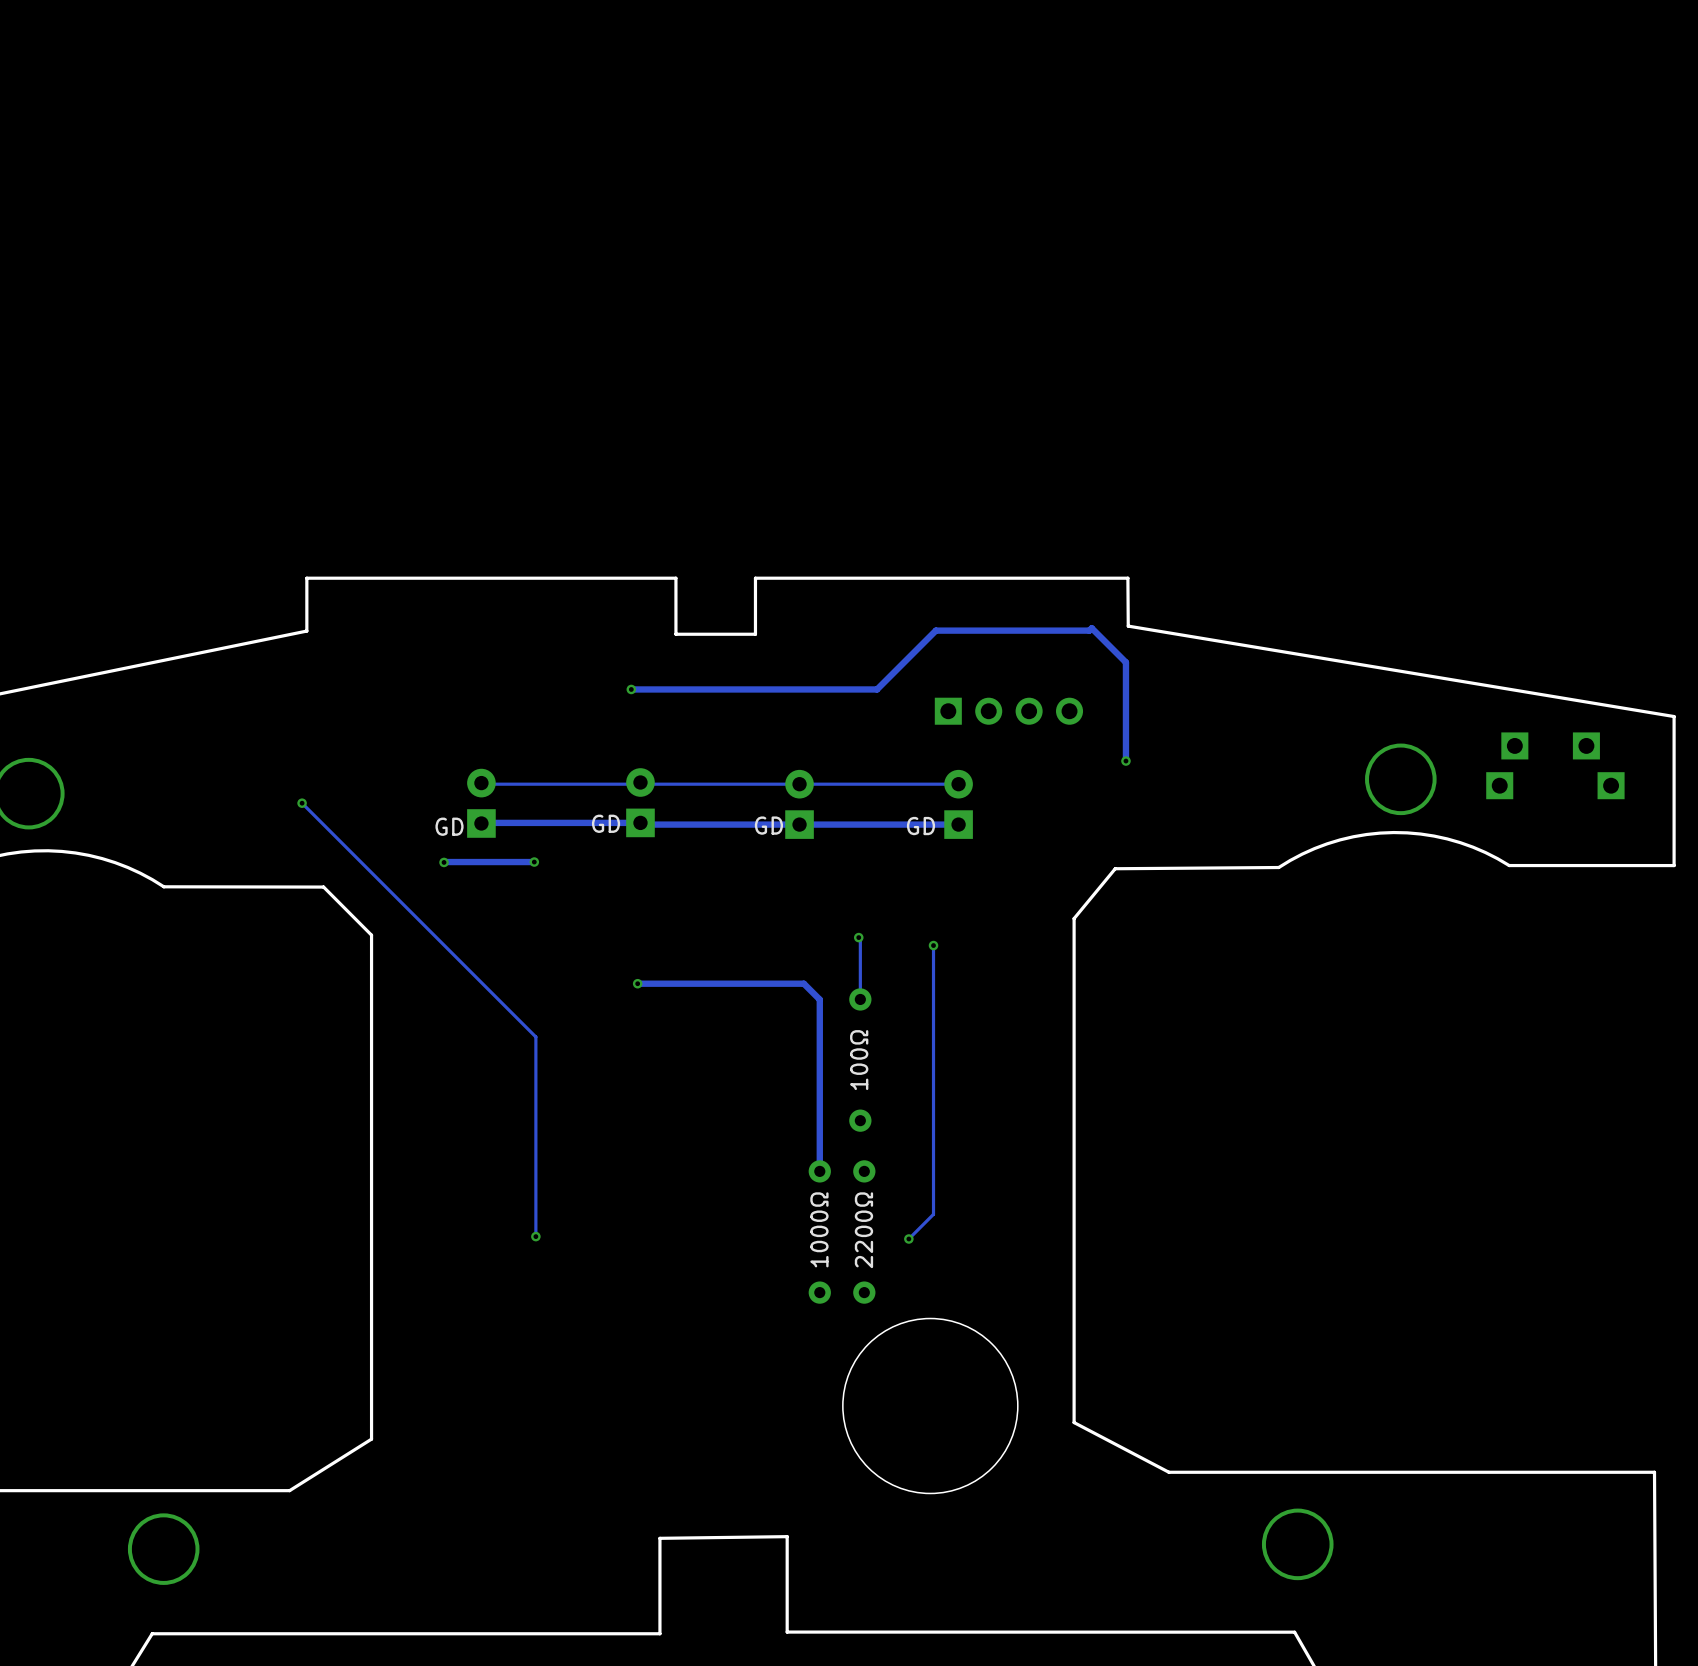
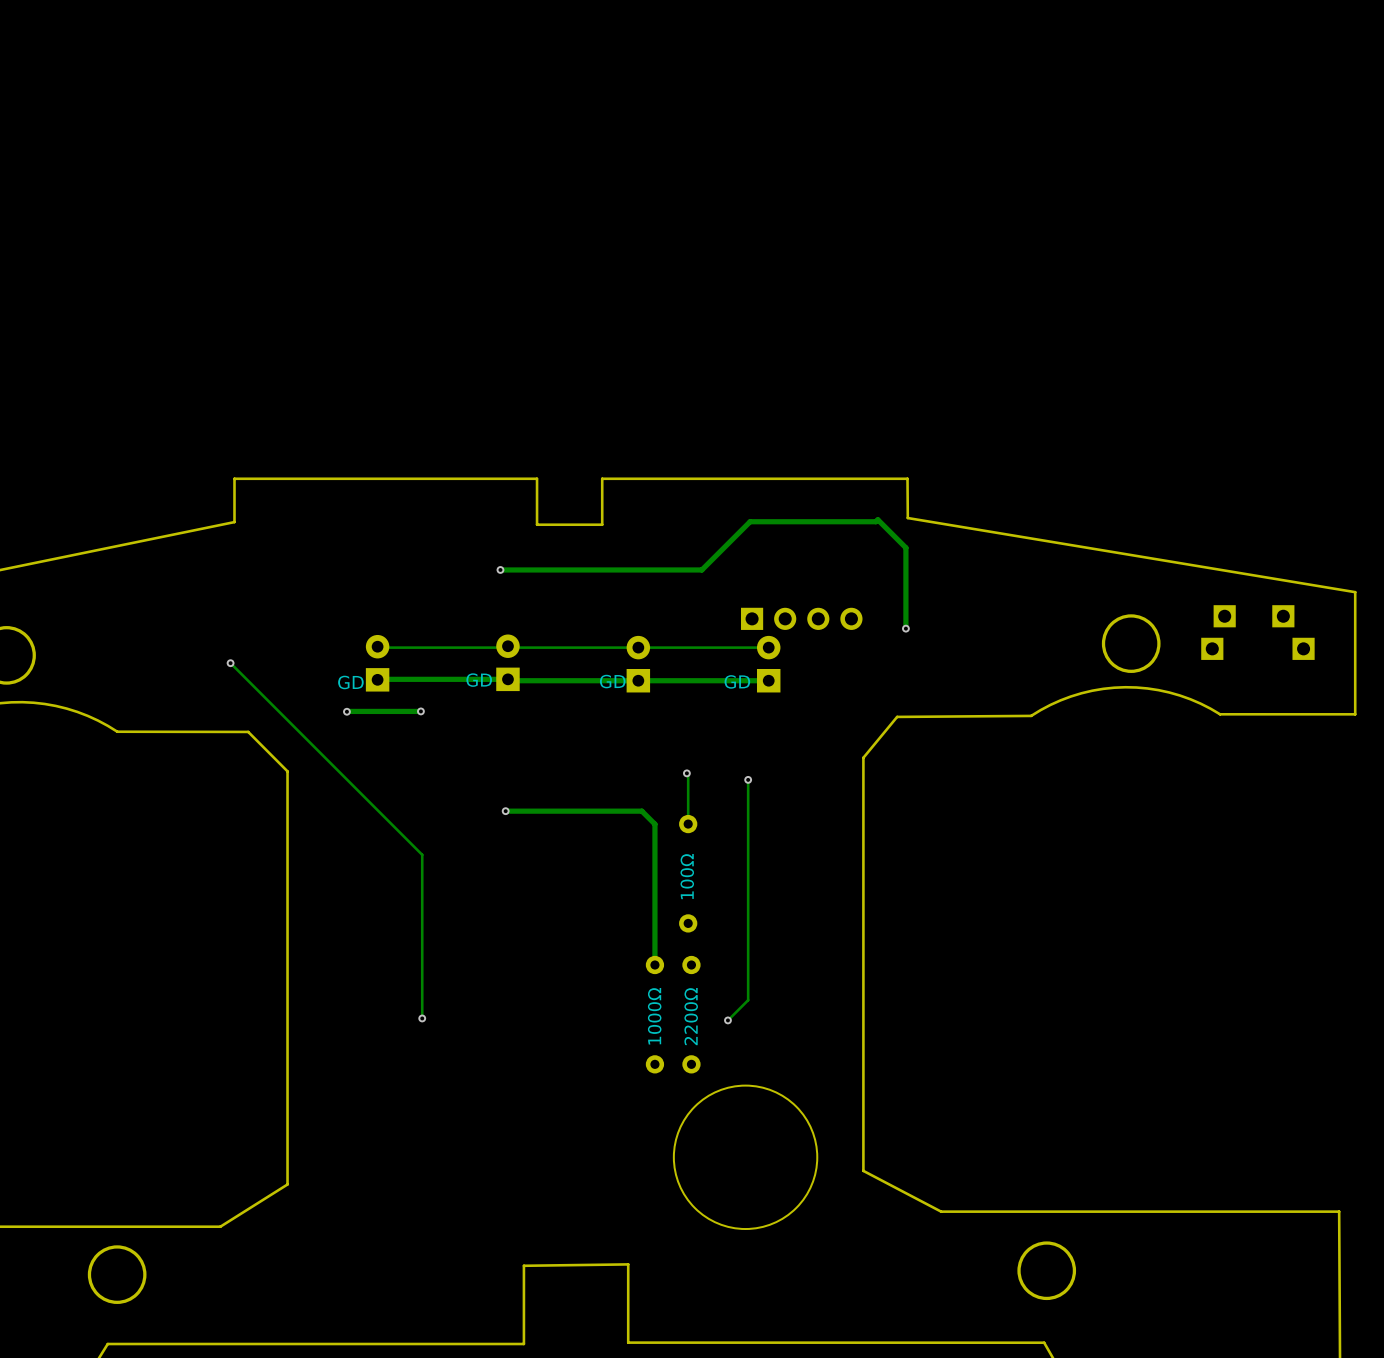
part position: (1008, 711) -> (801, 618)

